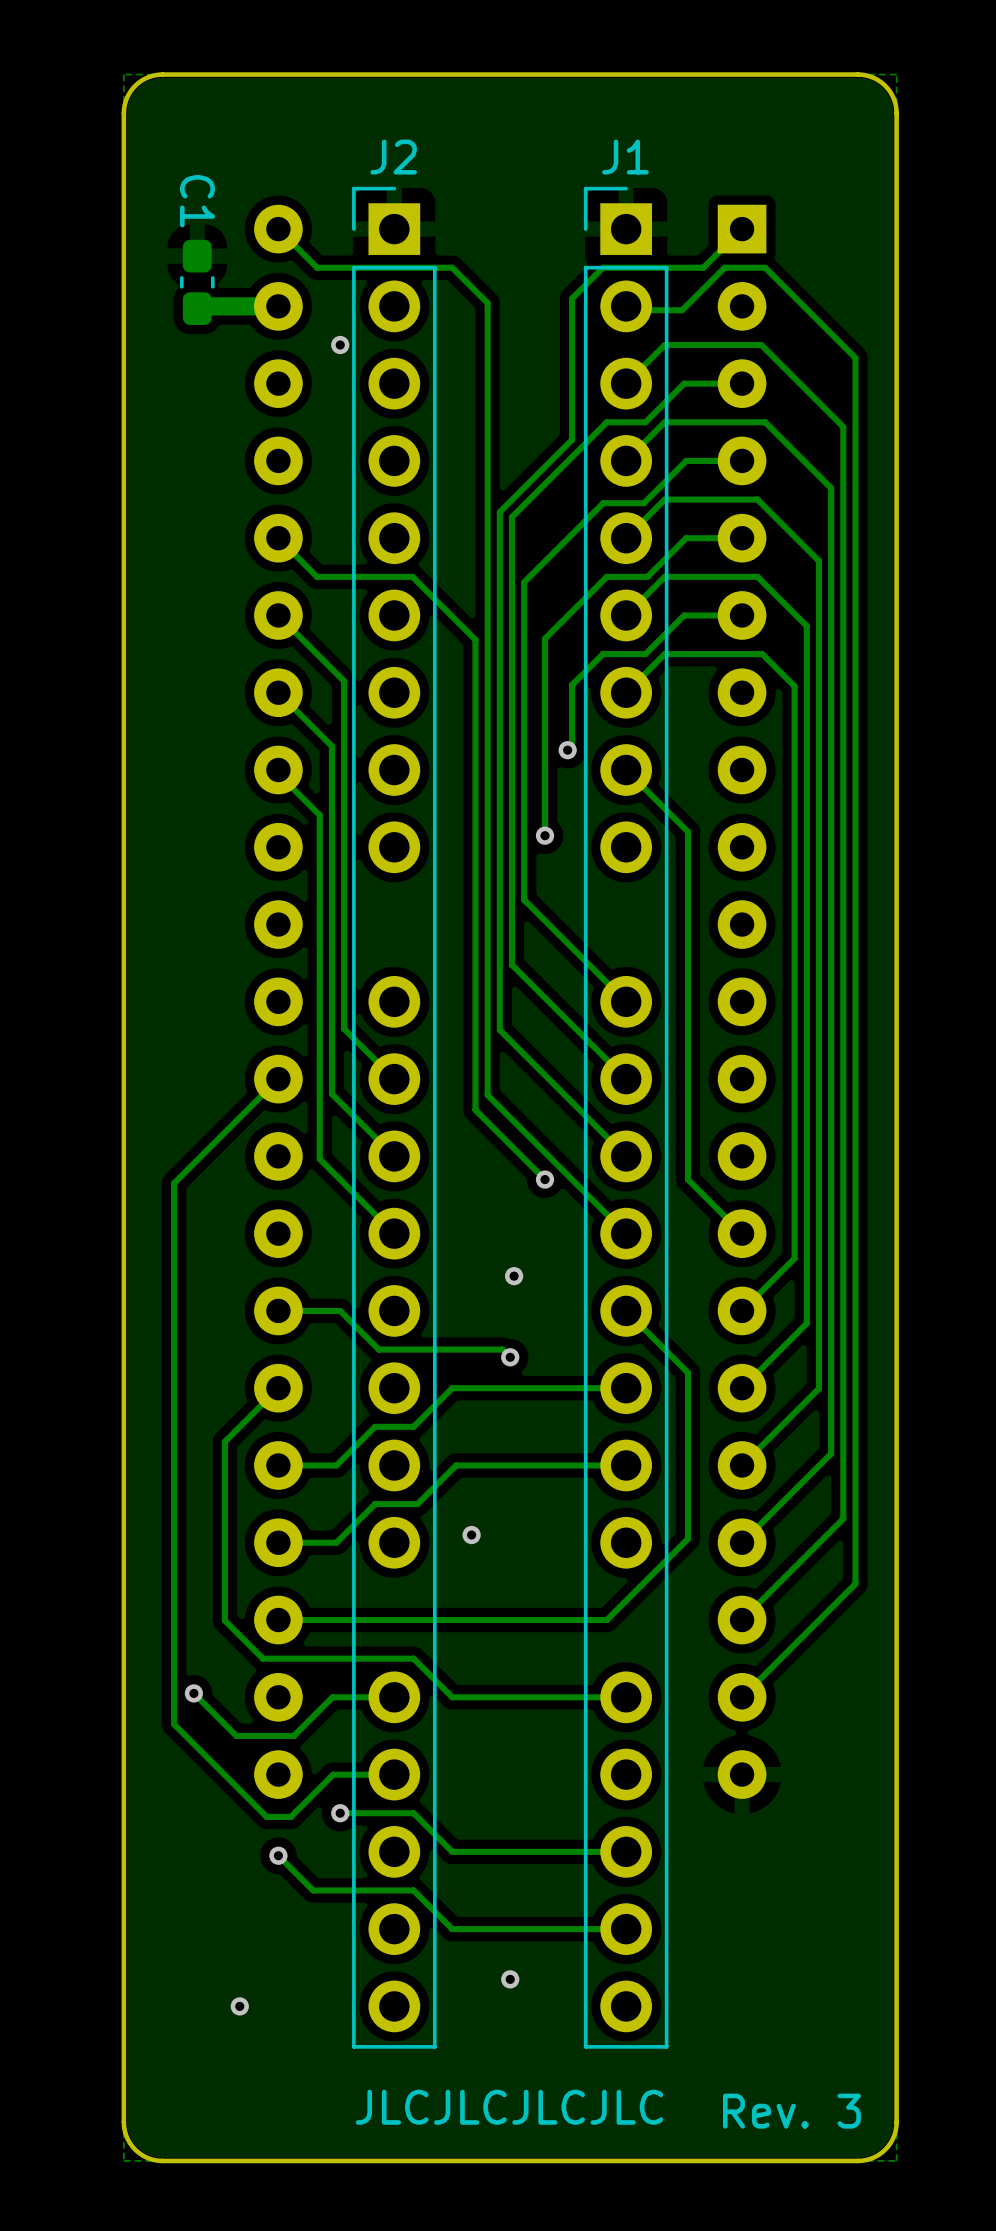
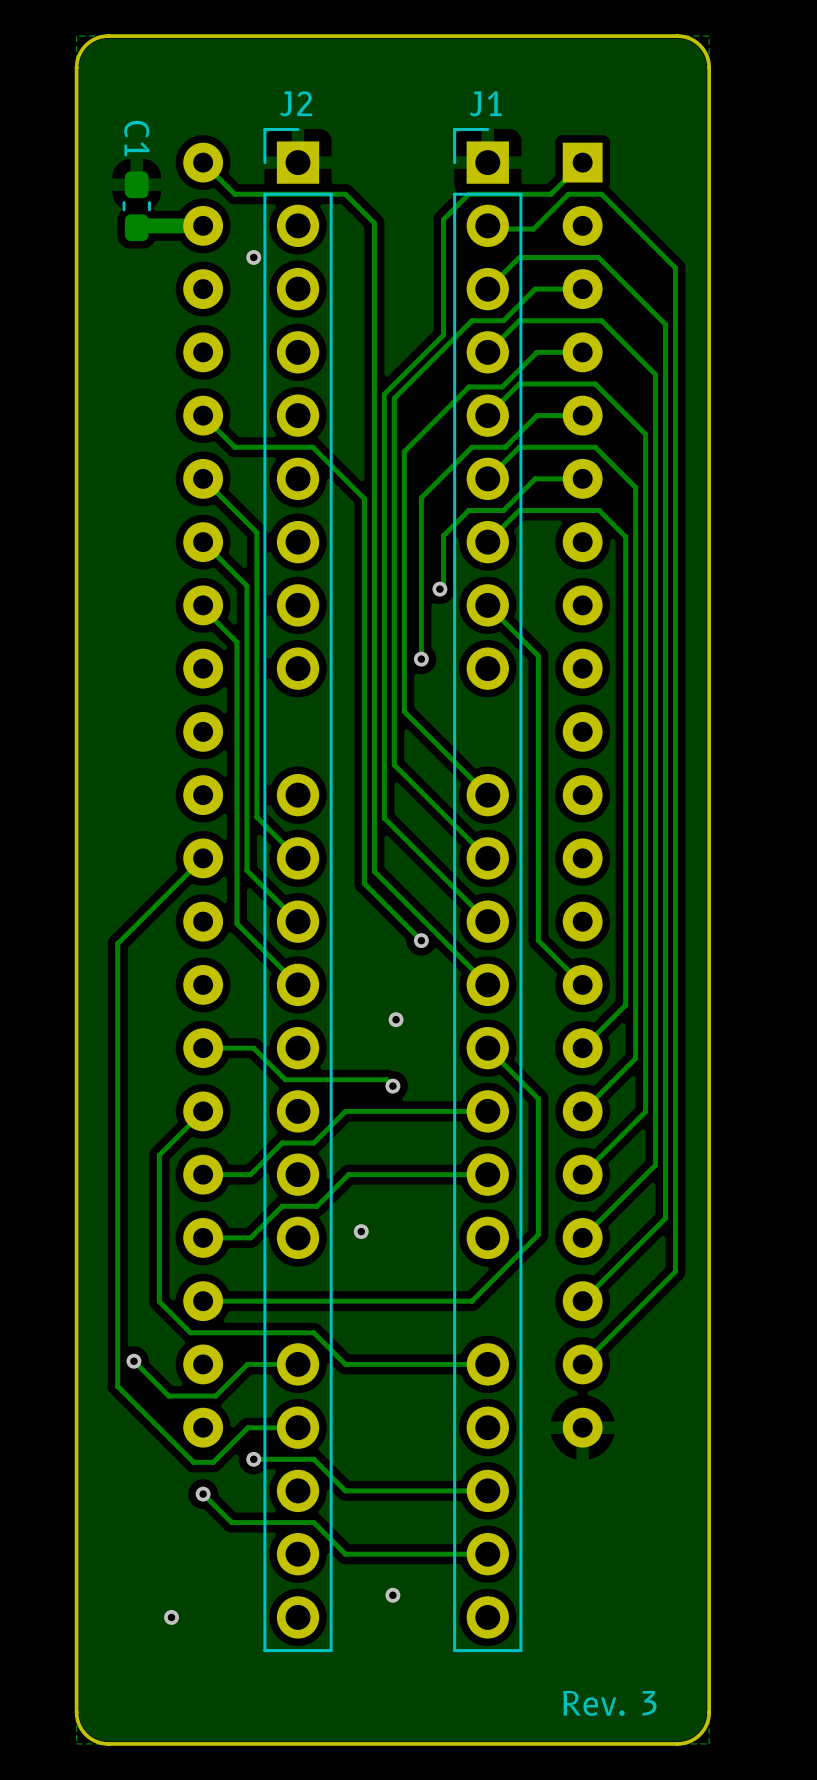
text: JLCJLCJLCJLC (509, 2107) -> none

